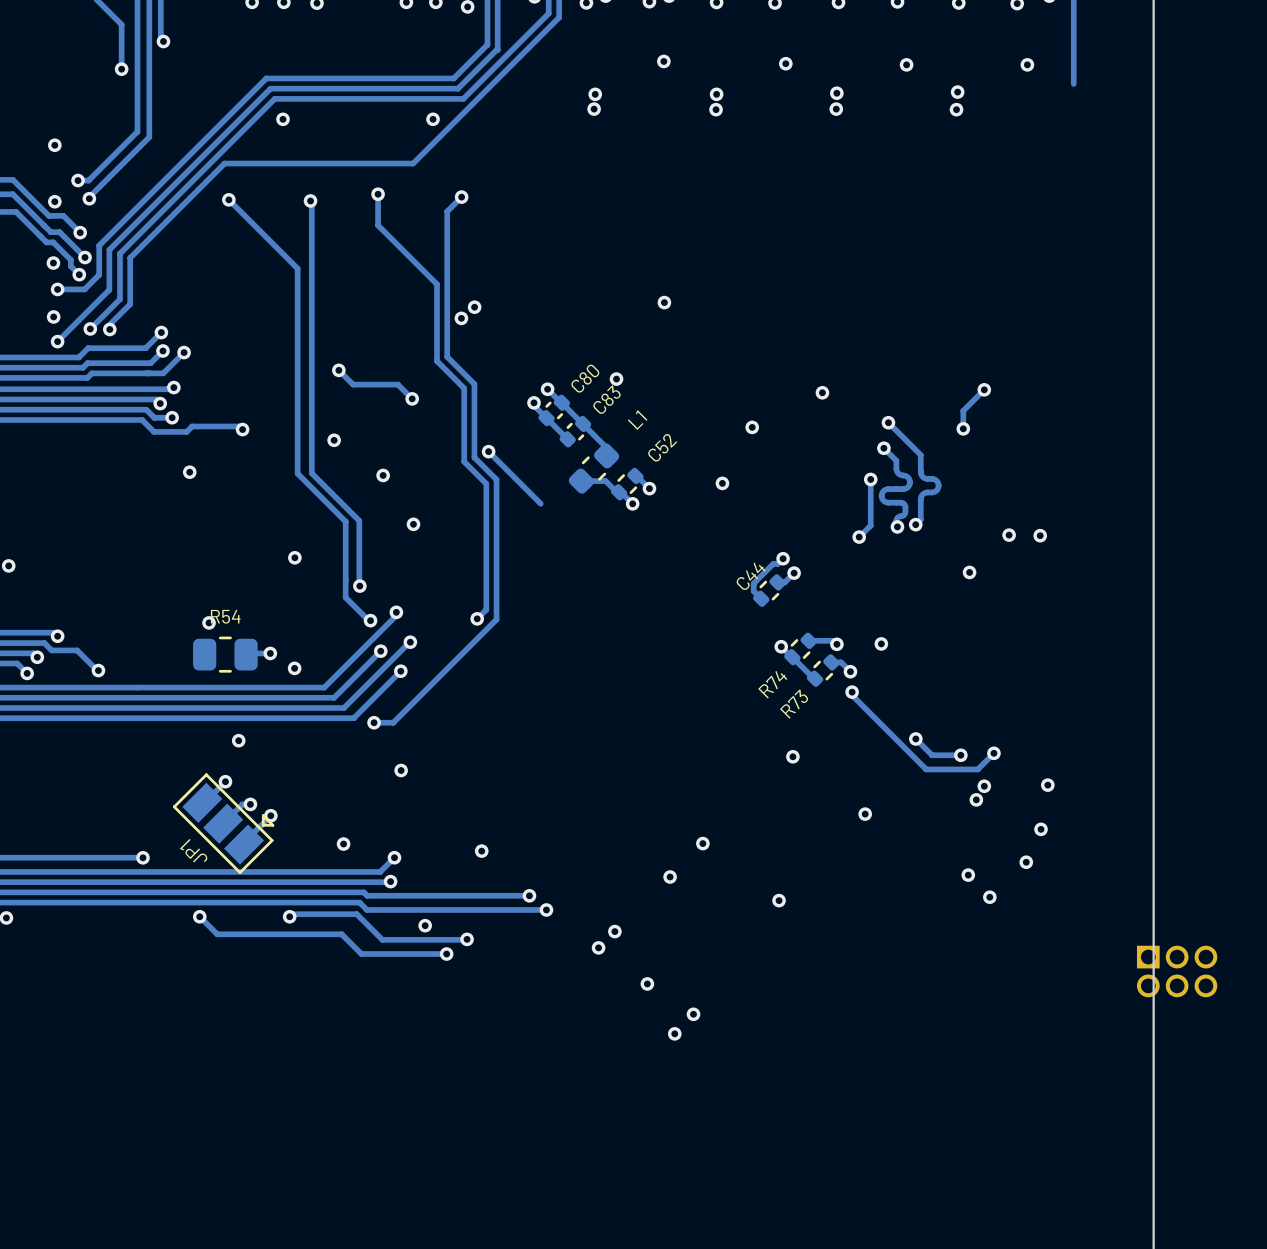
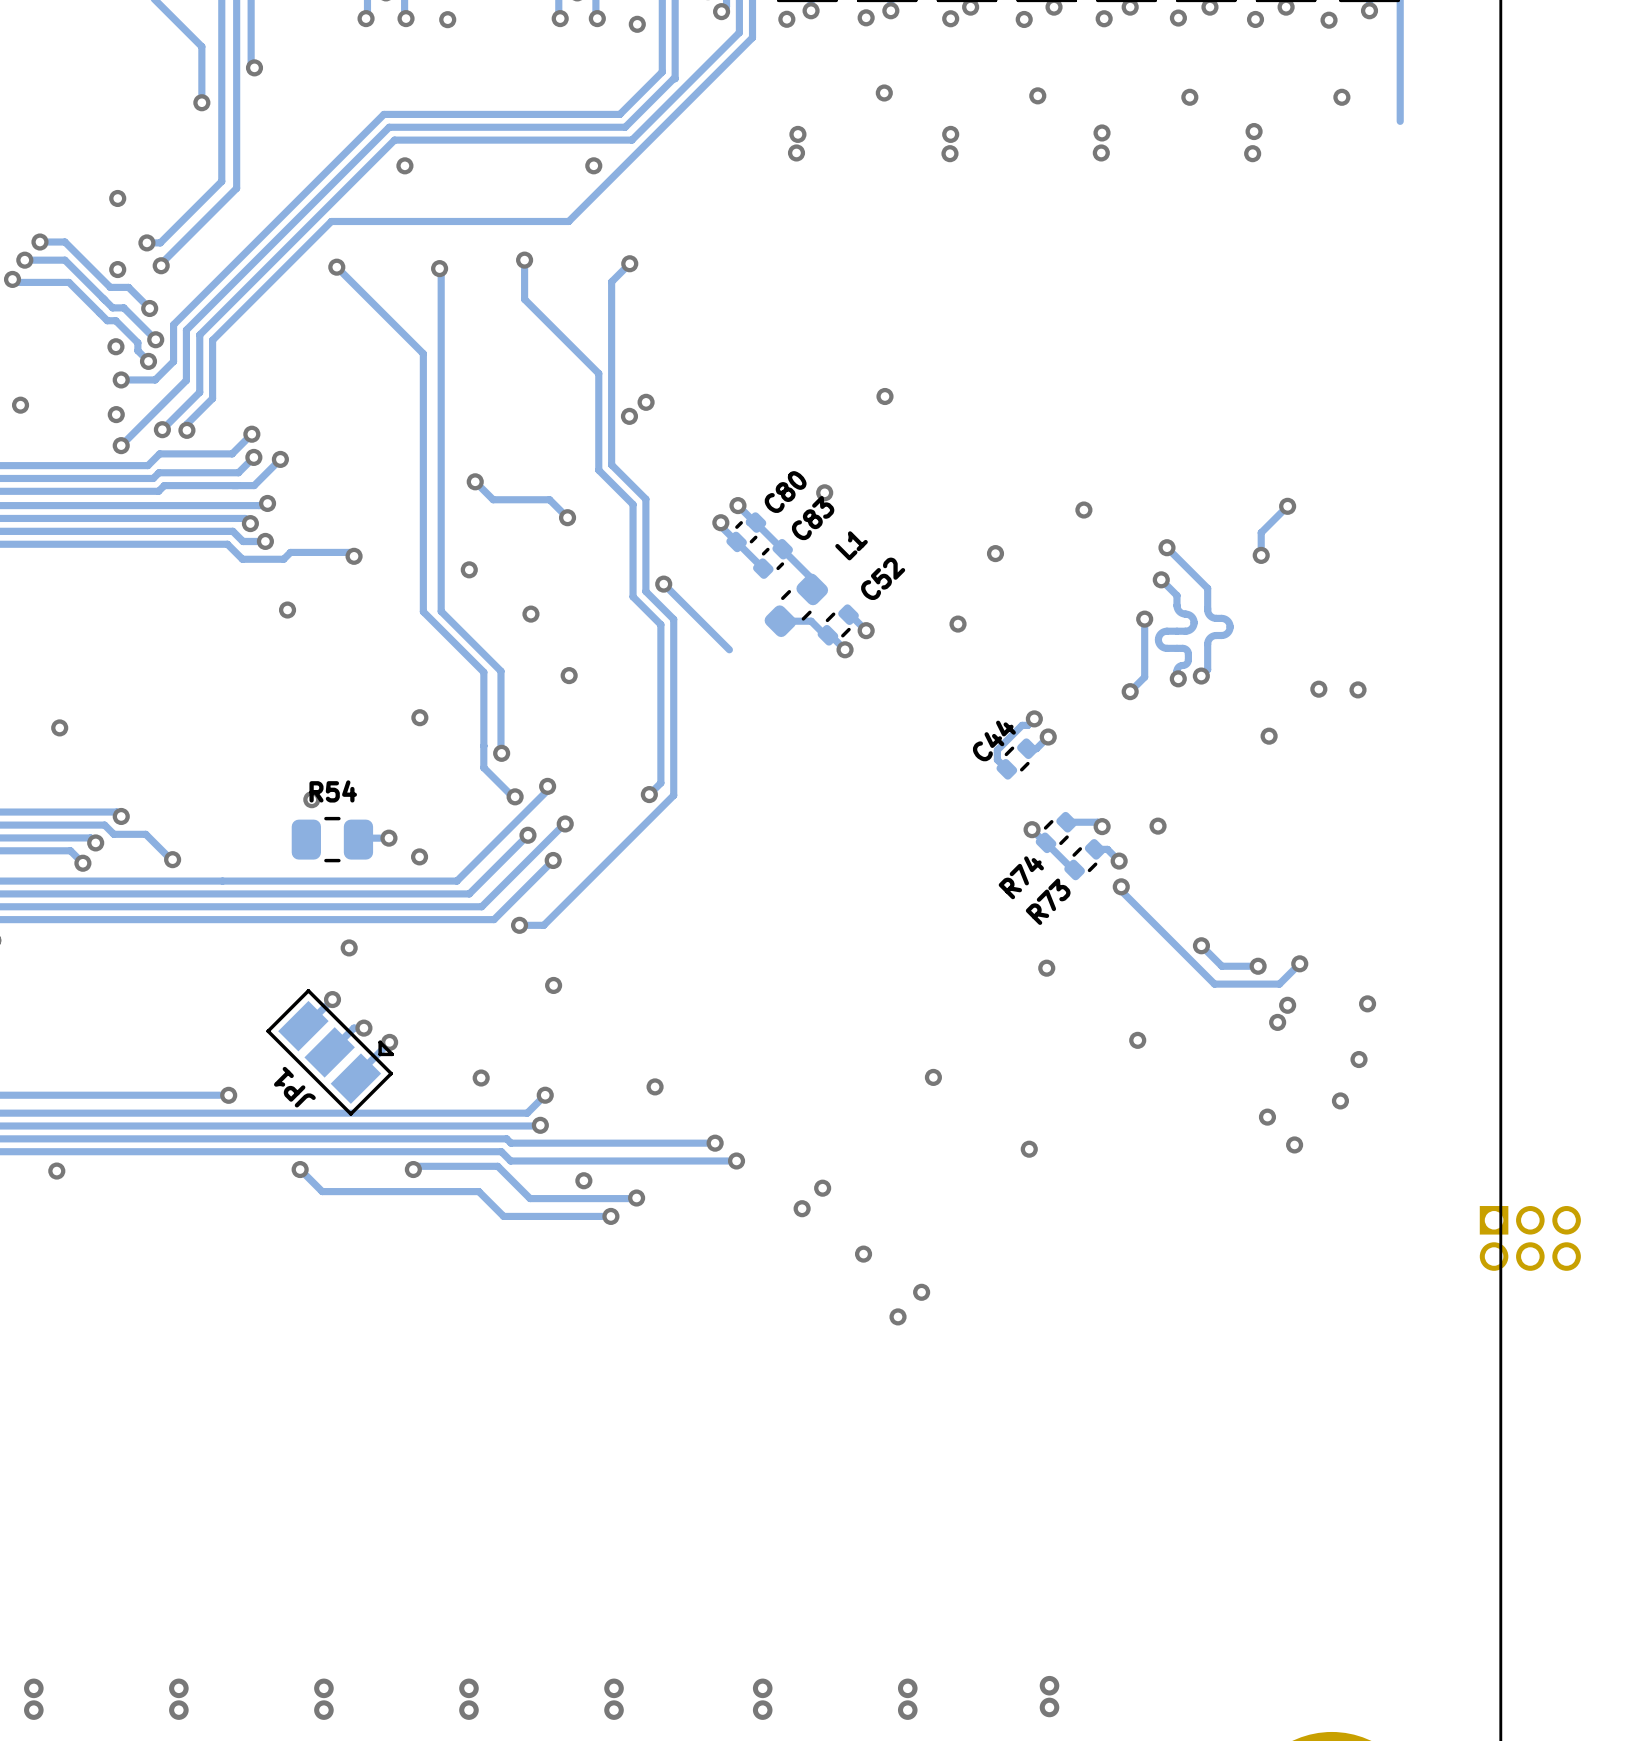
via: (670, 877) -> none

